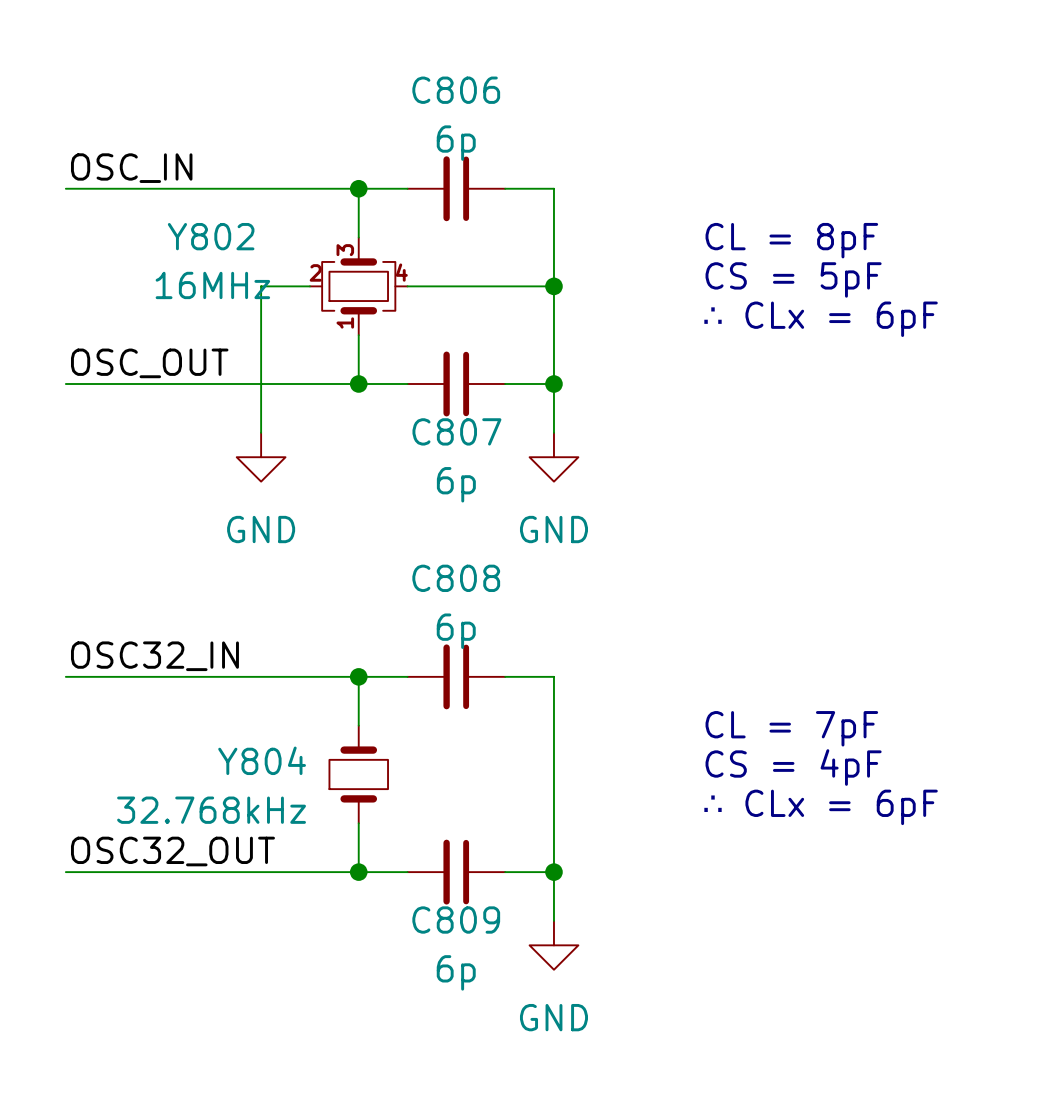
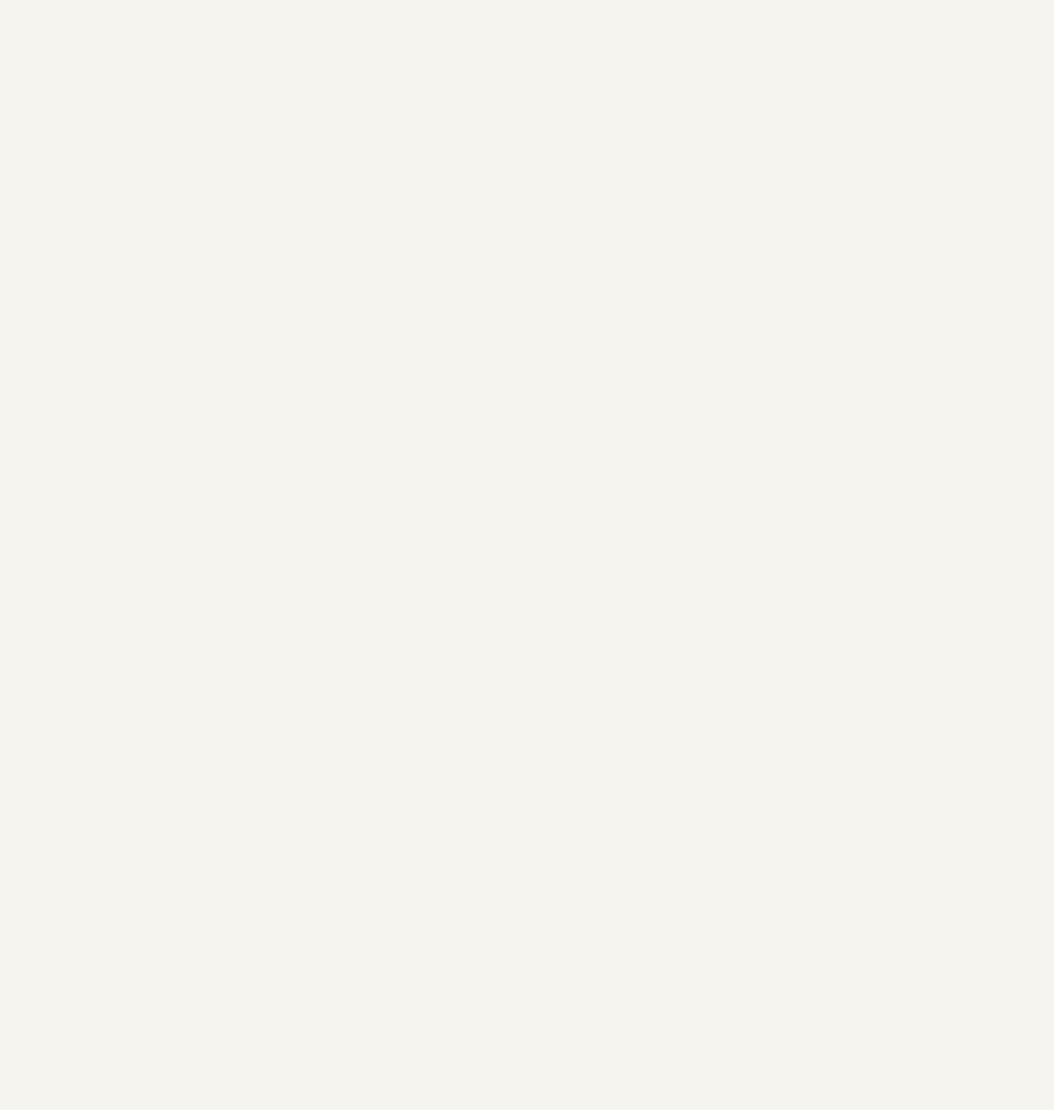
label: OSC_IN (131, 168) -> none
wire: (65, 188) (407, 188) -> none
wire: (358, 188) (358, 237) -> none
junction: (358, 188) -> none
C806: 6p (456, 188) -> none
wire: (505, 188) (553, 188) (553, 432) -> none
text: CL = 8pF (791, 240) -> none
text: CS = 5pF (793, 279) -> none
wire: (309, 286) (261, 286) (261, 432) -> none
Y802: 16MHz (358, 286) -> none
wire: (407, 286) (553, 286) -> none
junction: (553, 286) -> none
text: ∴ CLx = 6pF (820, 319) -> none
wire: (358, 335) (358, 384) -> none
label: OSC_OUT (149, 363) -> none
wire: (65, 384) (407, 384) -> none
junction: (358, 384) -> none
C807: 6p (456, 384) -> none
wire: (505, 384) (553, 384) -> none
junction: (553, 384) -> none
power symbol: GND (261, 457) -> none
power symbol: GND (553, 457) -> none
label: OSC32_IN (154, 656) -> none
wire: (65, 676) (407, 676) -> none
wire: (358, 676) (358, 725) -> none
junction: (358, 676) -> none
C808: 6p (456, 676) -> none
wire: (505, 676) (553, 676) (553, 920) -> none
text: CL = 7pF (791, 728) -> none
text: CS = 4pF (793, 767) -> none
Y804: 32.768kHz (358, 774) -> none
text: ∴ CLx = 6pF (820, 807) -> none
wire: (358, 823) (358, 872) -> none
label: OSC32_OUT (172, 851) -> none
wire: (65, 872) (407, 872) -> none
junction: (358, 872) -> none
C809: 6p (456, 872) -> none
wire: (505, 872) (553, 872) -> none
junction: (553, 872) -> none
power symbol: GND (553, 945) -> none

